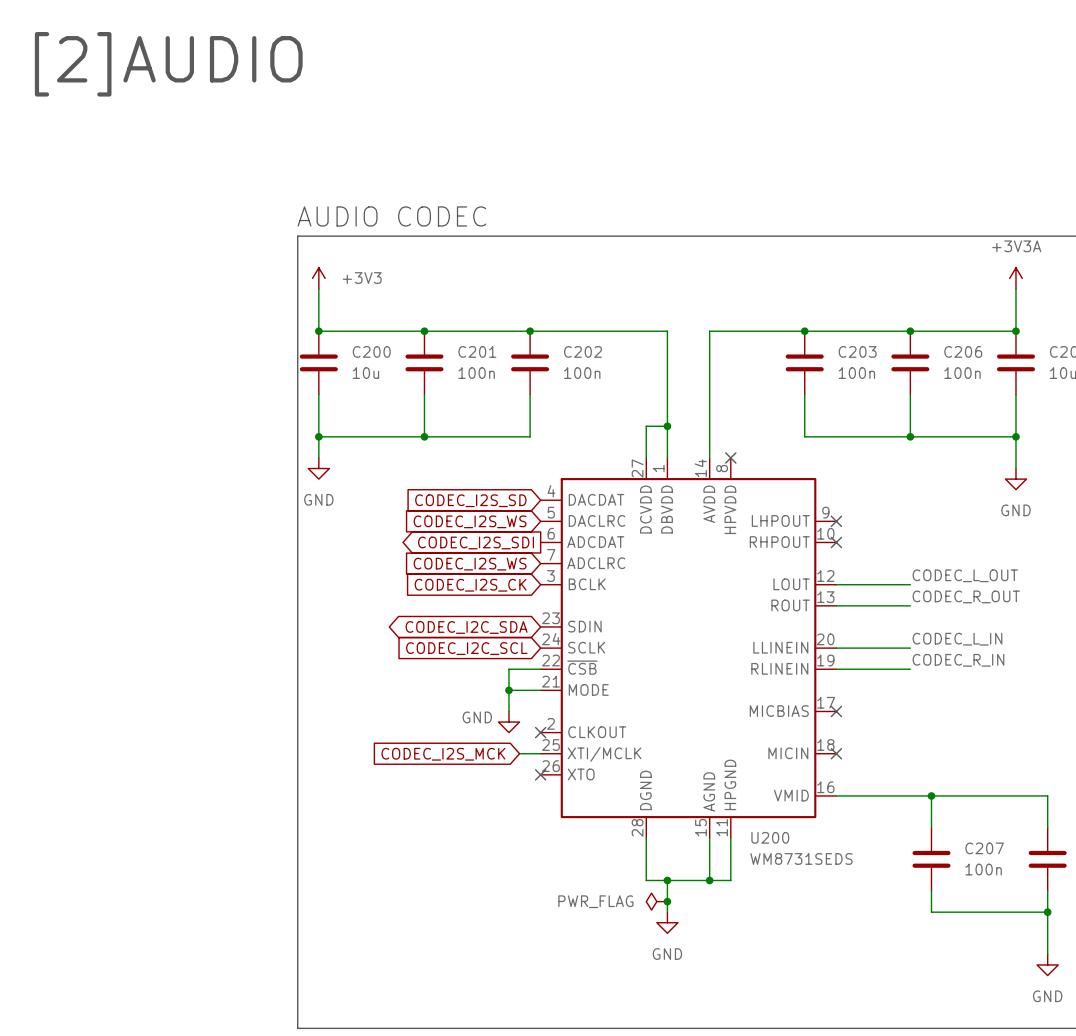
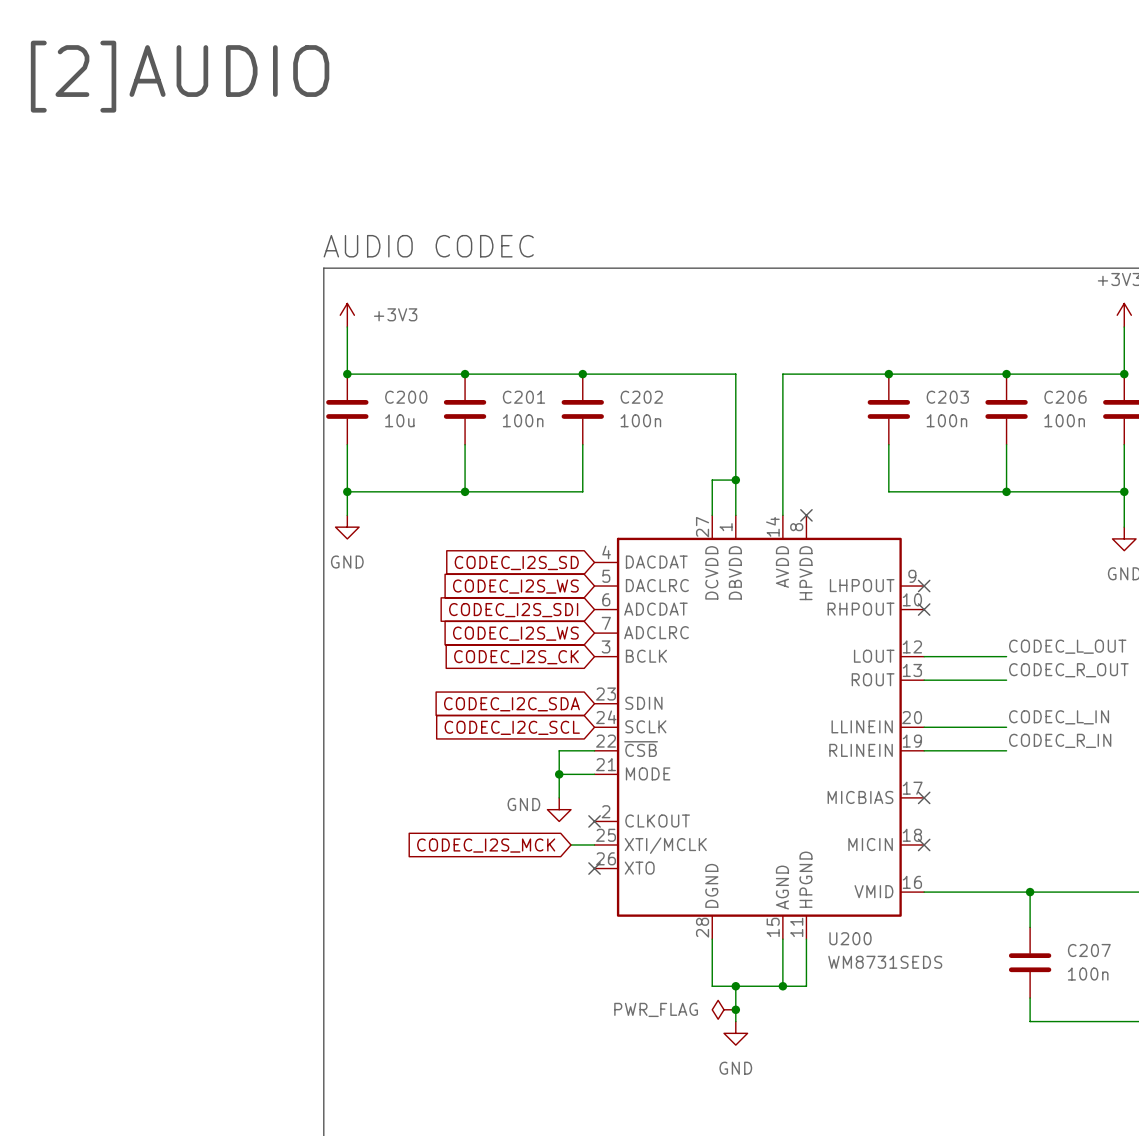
global label shape: output (476, 542) -> input (513, 610)
global label shape: bidirectional (466, 627) -> input (511, 704)

